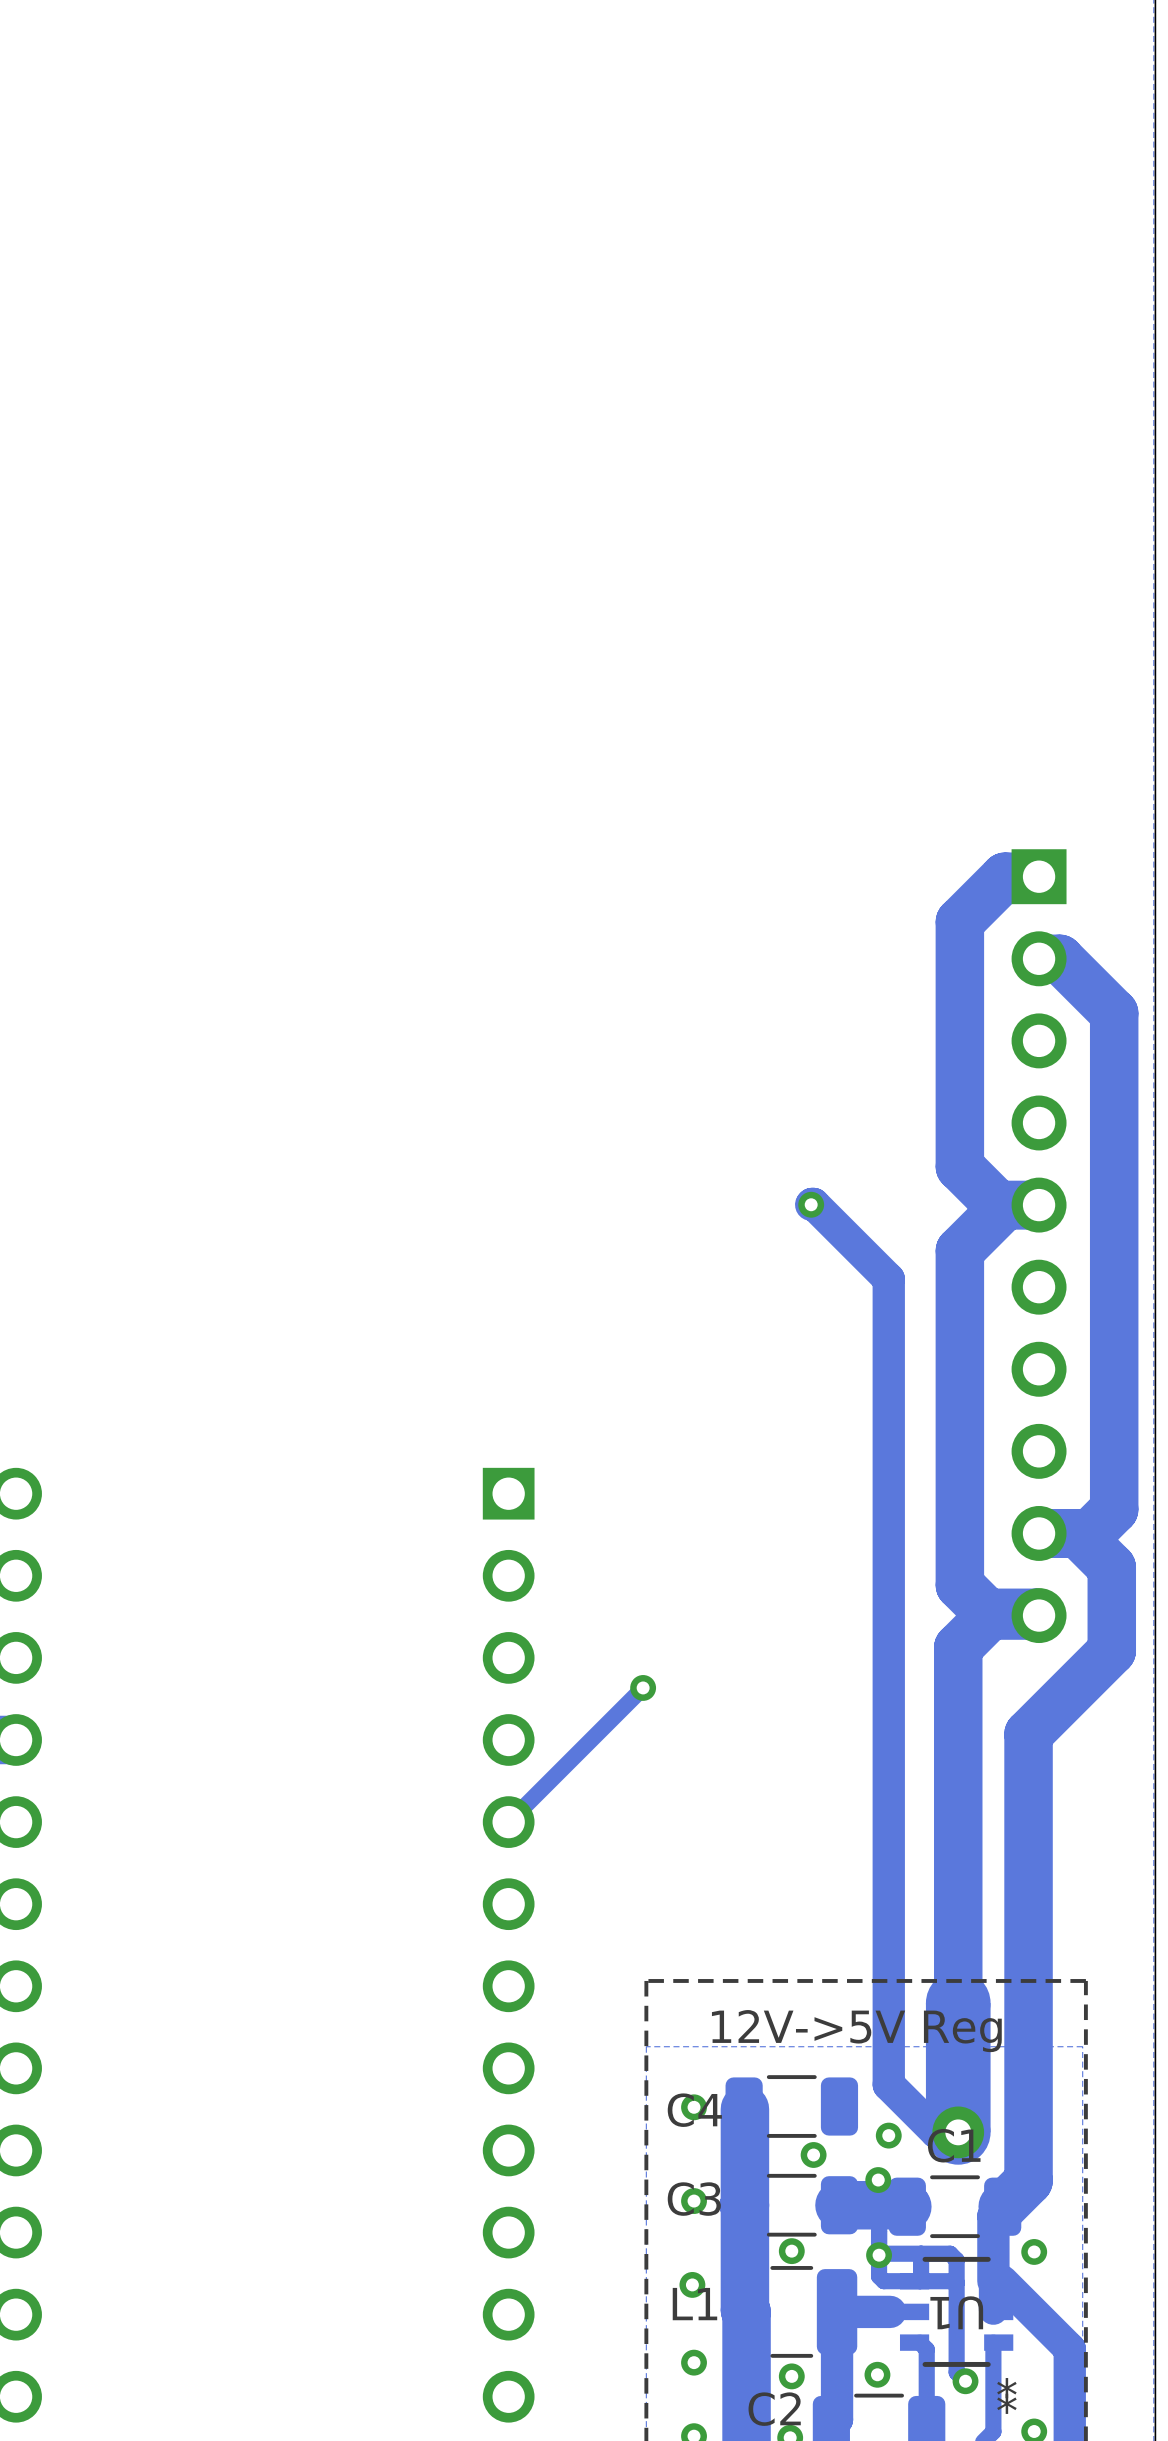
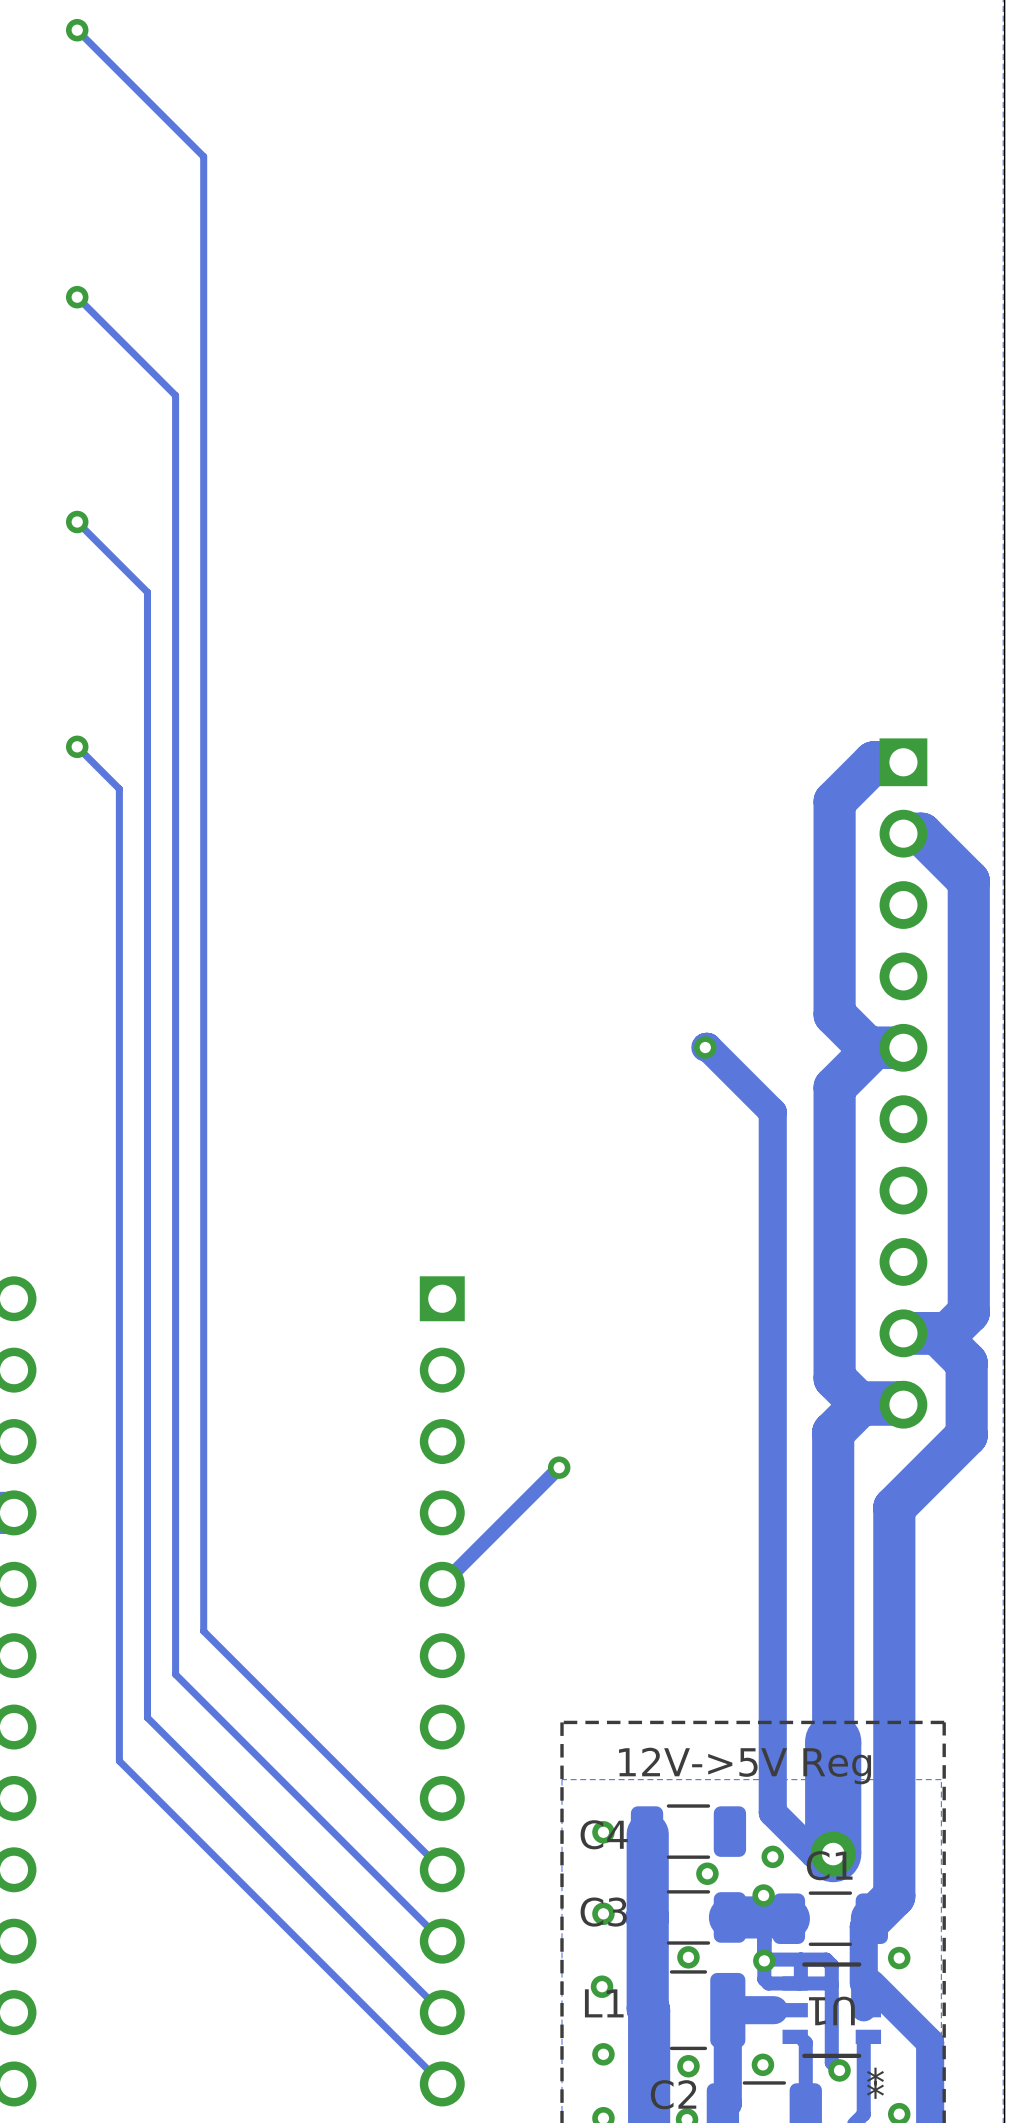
track: none -> (77, 30) (203, 156) (203, 1631) (442, 1869)
via: none -> (77, 30)
track: none -> (77, 297) (175, 395) (175, 1674) (442, 1941)
via: none -> (77, 297)
track: none -> (77, 522) (147, 592) (147, 1717) (442, 2012)
via: none -> (77, 522)
track: none -> (77, 746) (119, 788) (119, 1761) (442, 2083)
via: none -> (77, 746)

